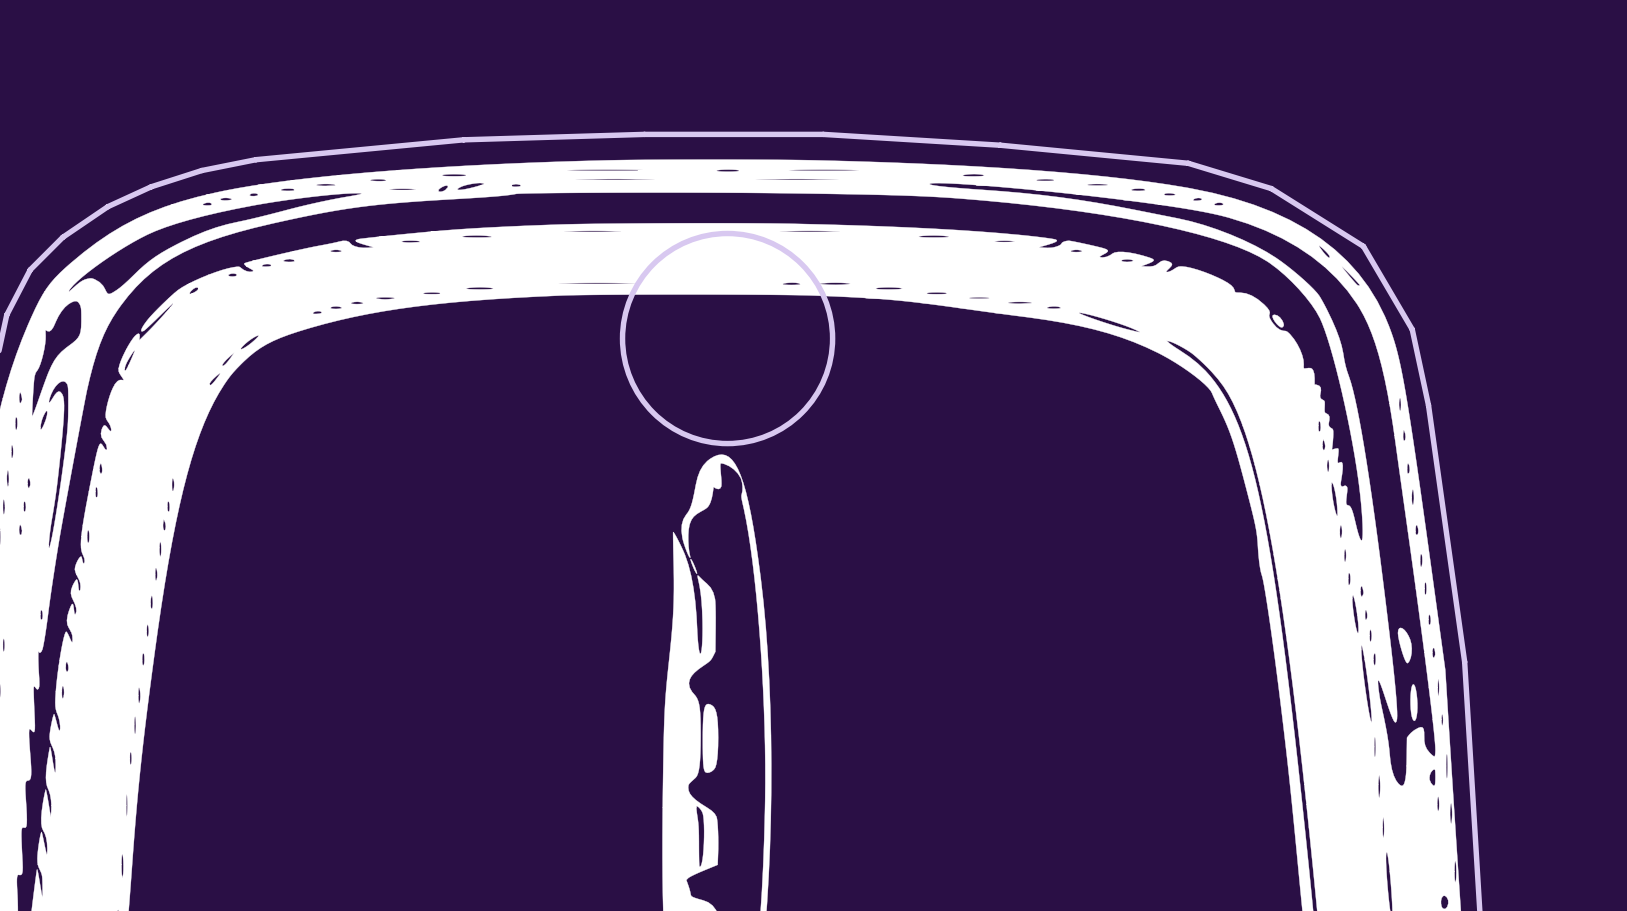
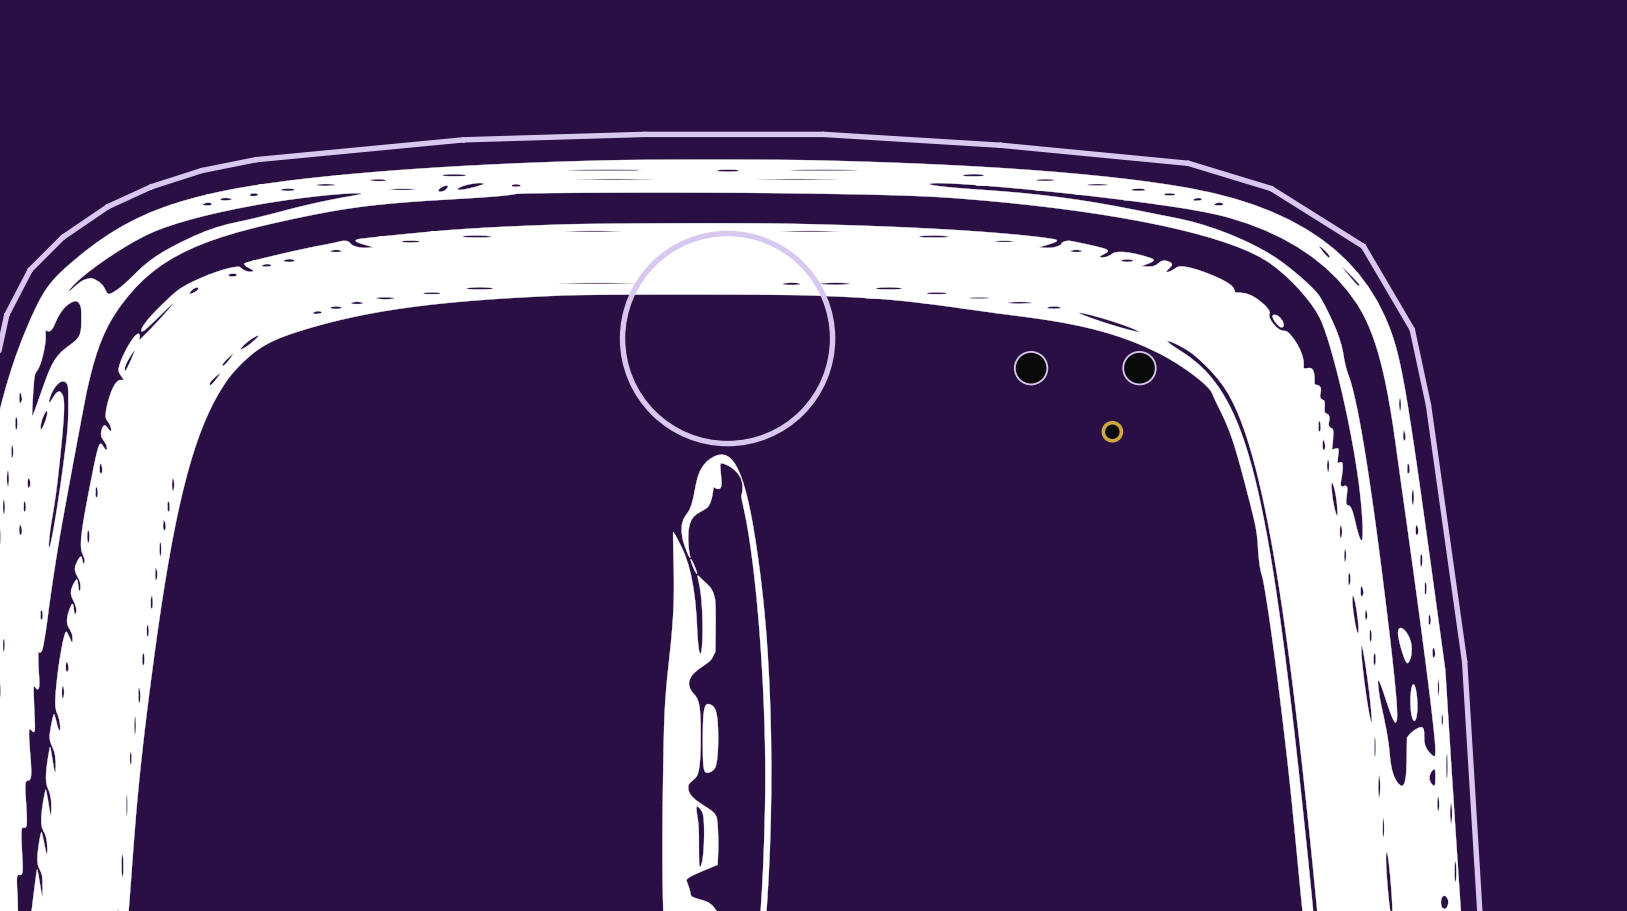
part: none -> (1085, 368)
via: none -> (1112, 431)

